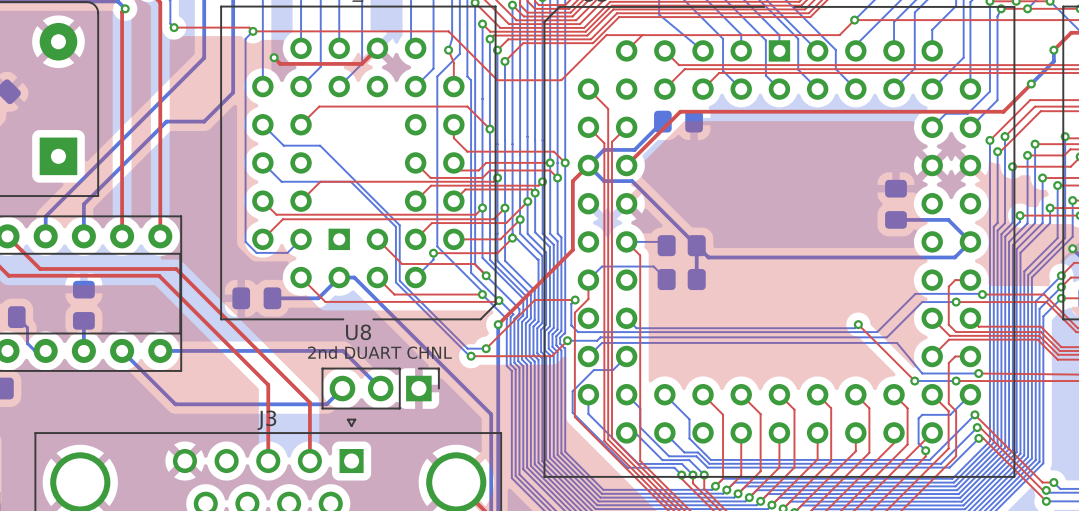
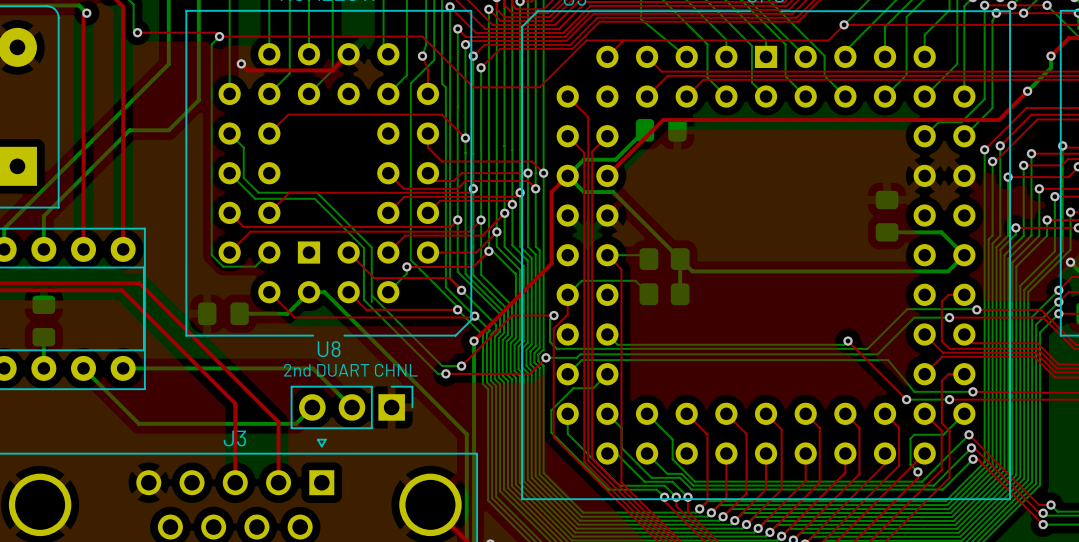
bottom track: (276, 138) (283, 145) (320, 145) (399, 225) (399, 234) -> (317, 192) (371, 247)
bottom track: (281, 181) (290, 181) -> (243, 147) (243, 177) (258, 192)
bottom track: (347, 181) (350, 181) (395, 226) (395, 282) (469, 356) -> (249, 192) (255, 198) (314, 198) (363, 247) (363, 299) (437, 373) (444, 373)

